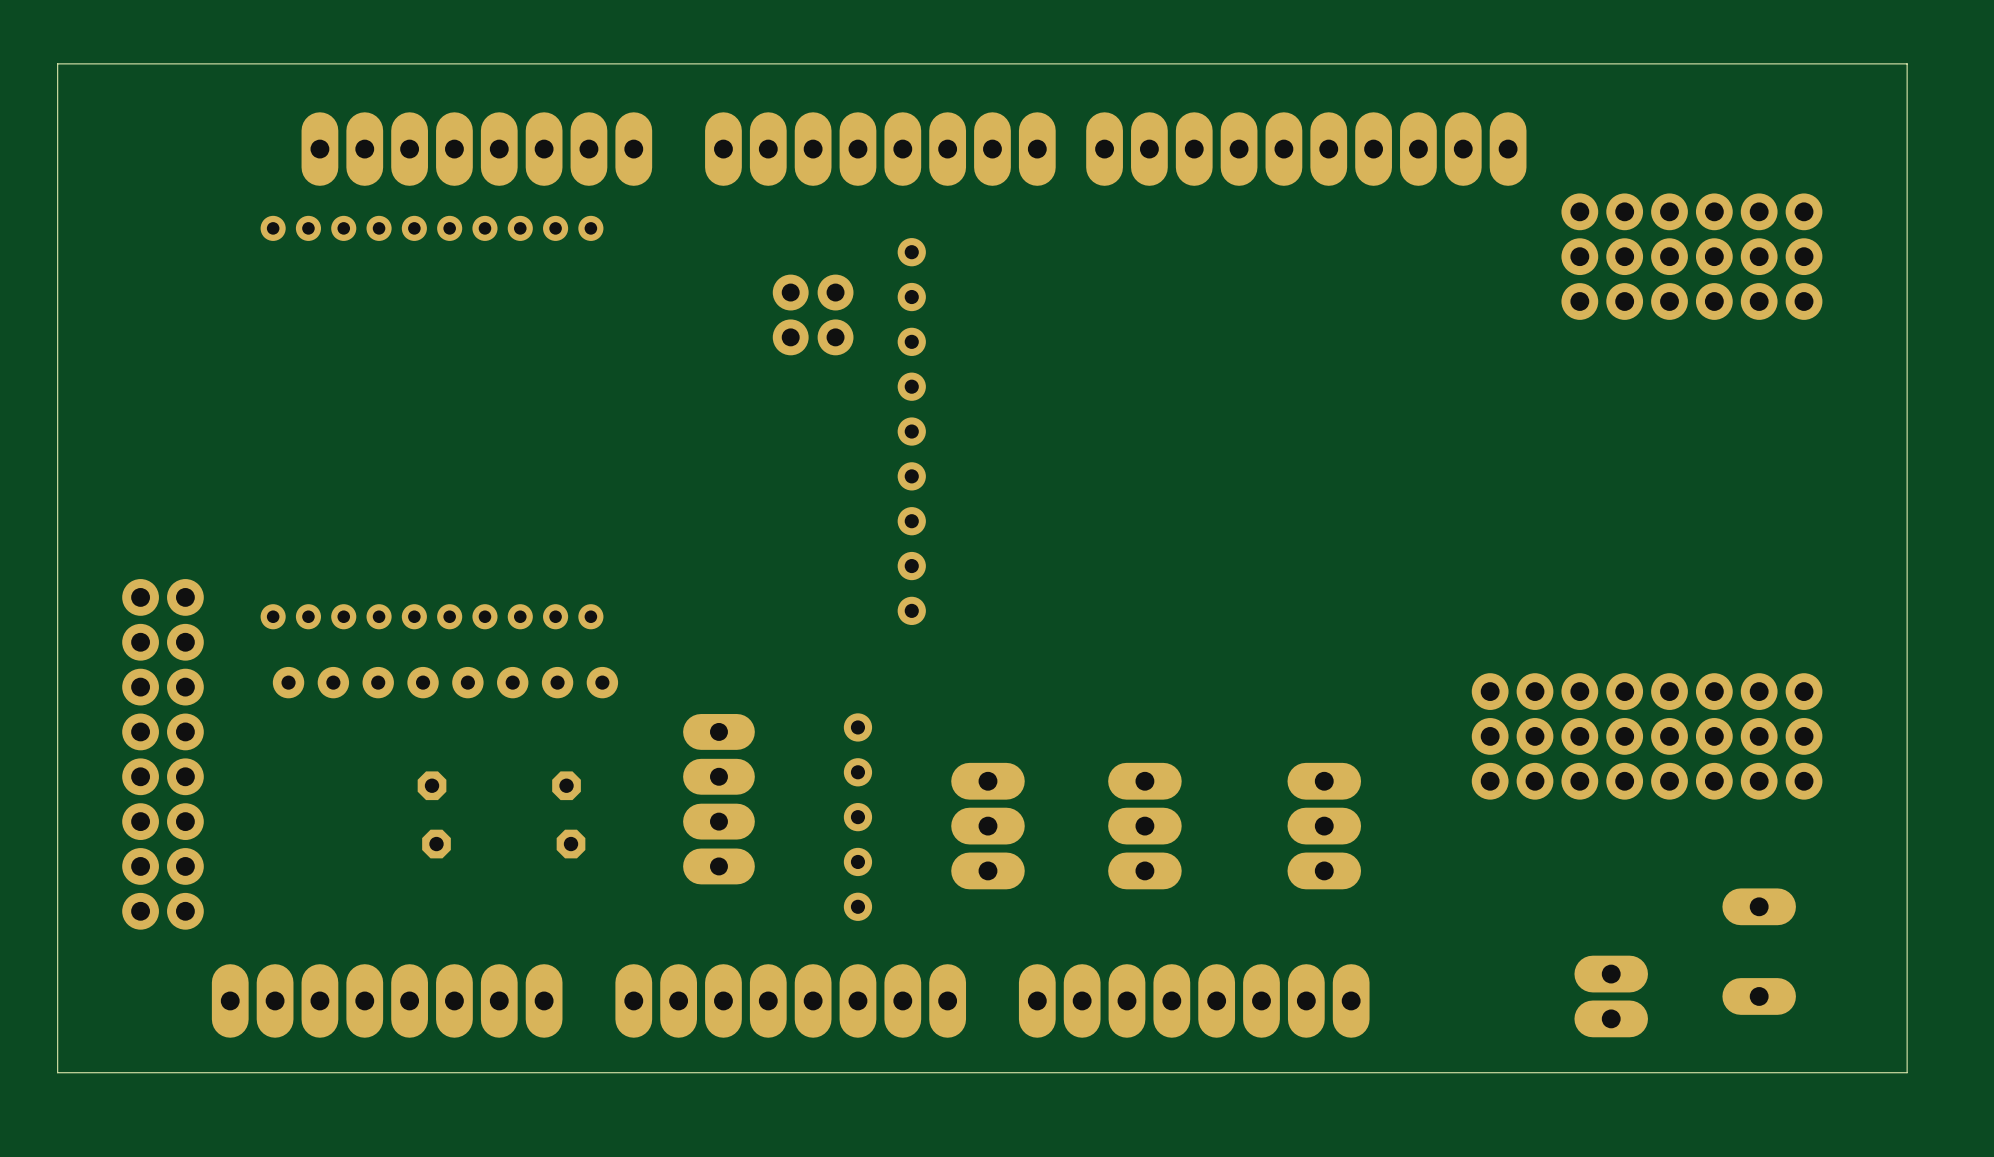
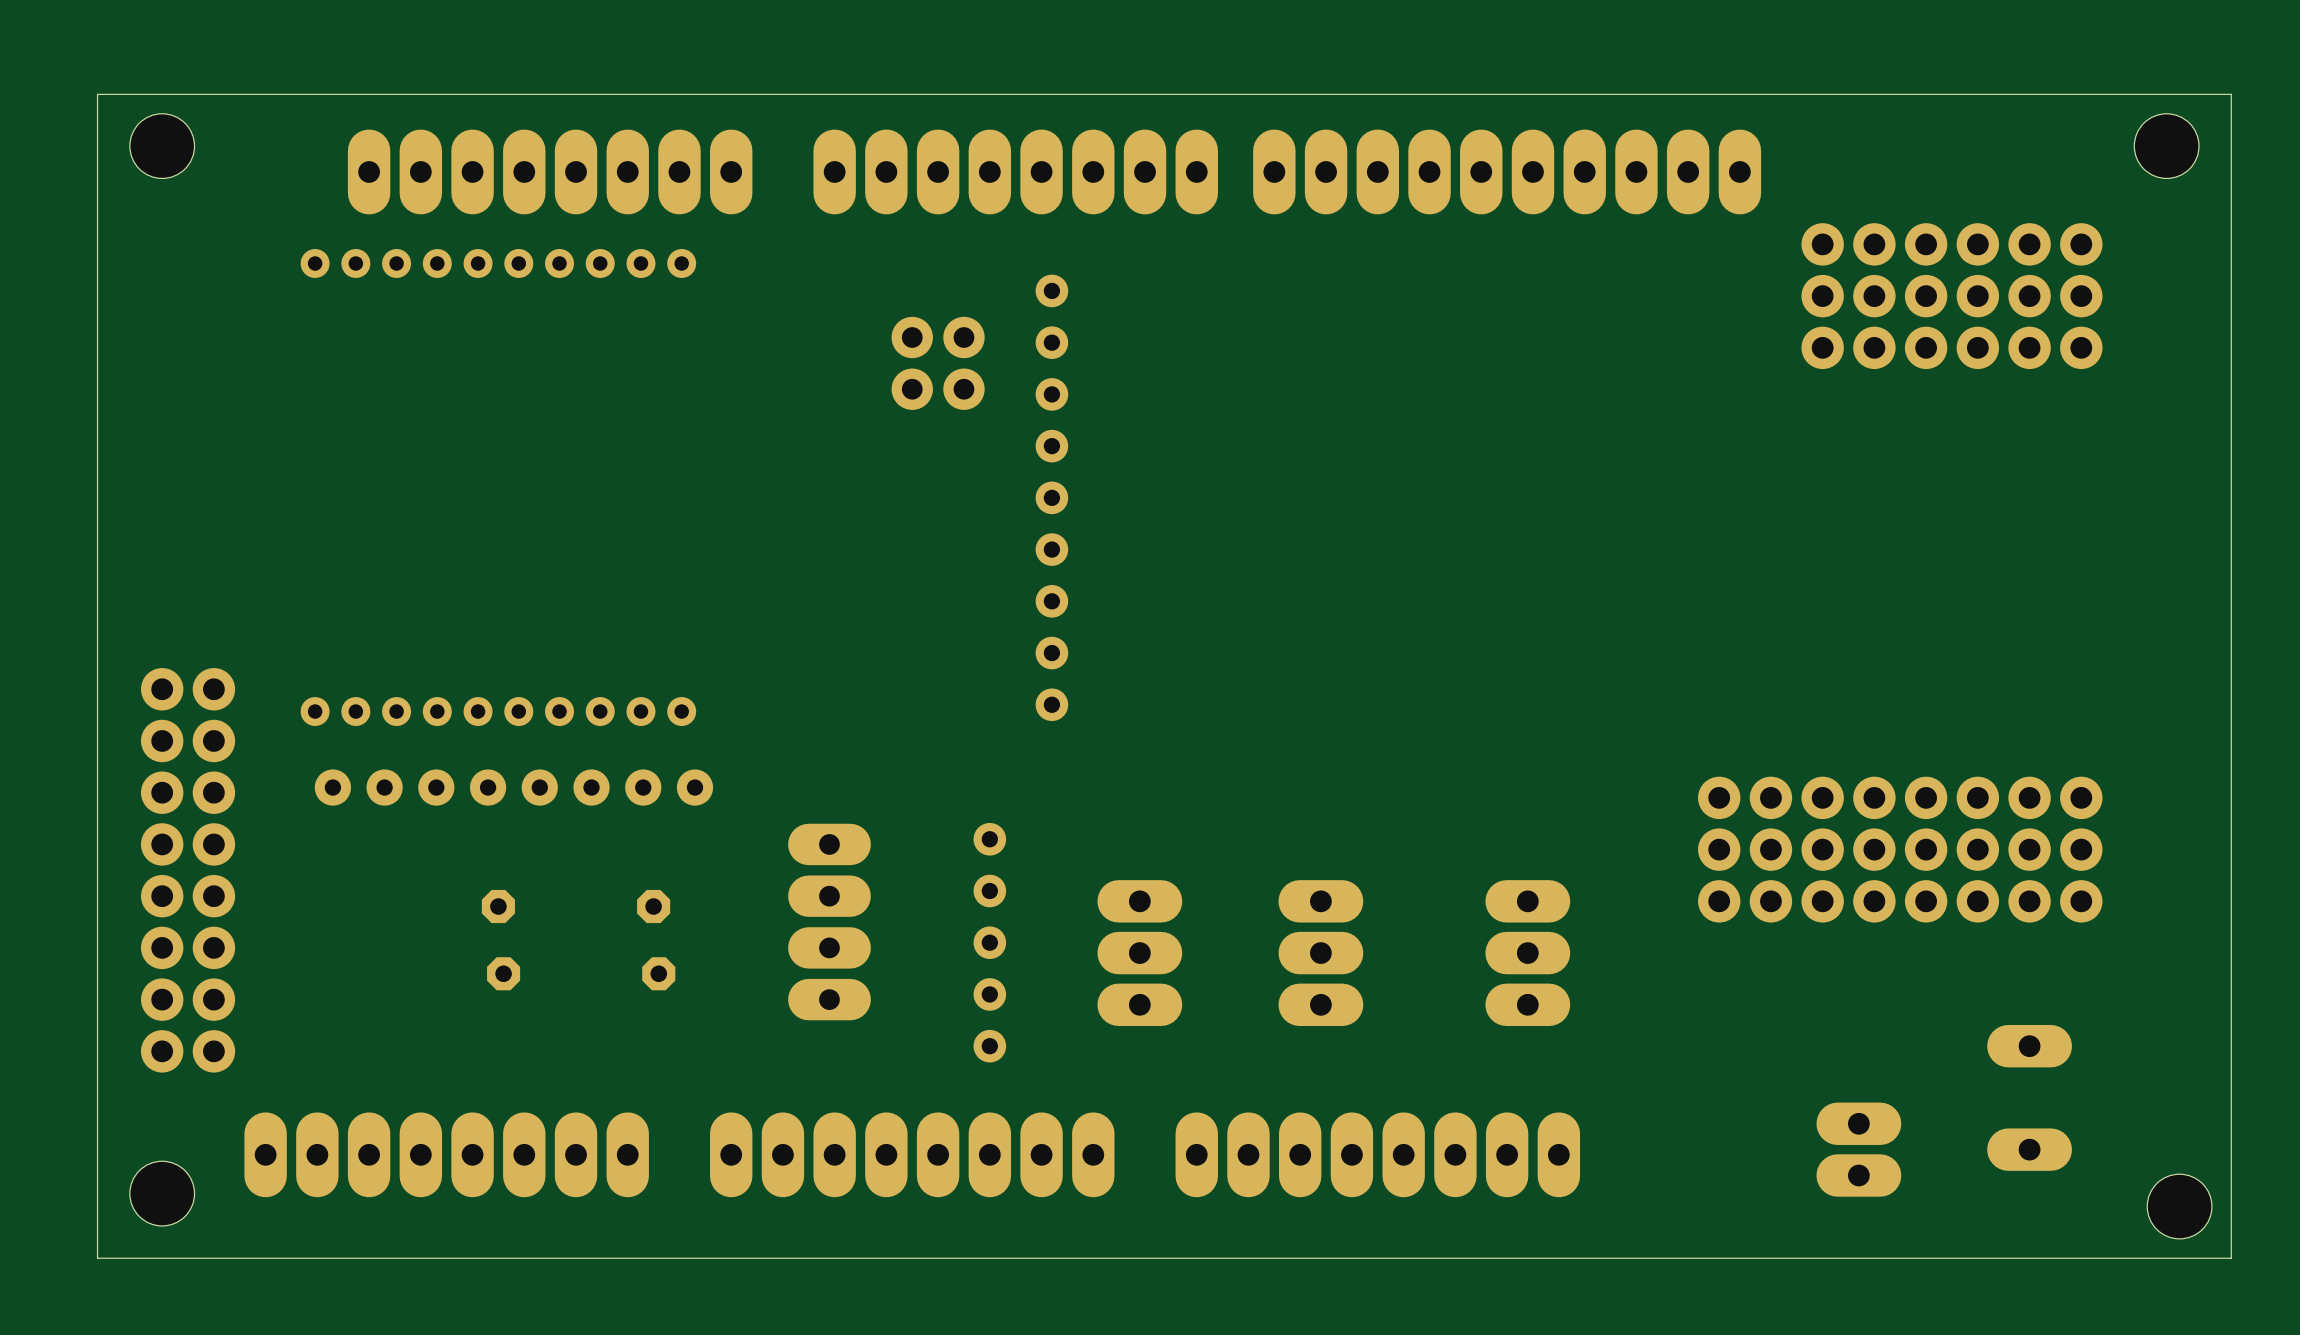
board edge: (1907, 63) (57, 63) (57, 1072) (1907, 1072) (1907, 63) -> (2231, 94) (2231, 1258) (97, 1258) (97, 94) (2231, 94)
hole: none -> (162, 146)
hole: none -> (2166, 146)
hole: none -> (162, 1193)
hole: none -> (2179, 1206)

